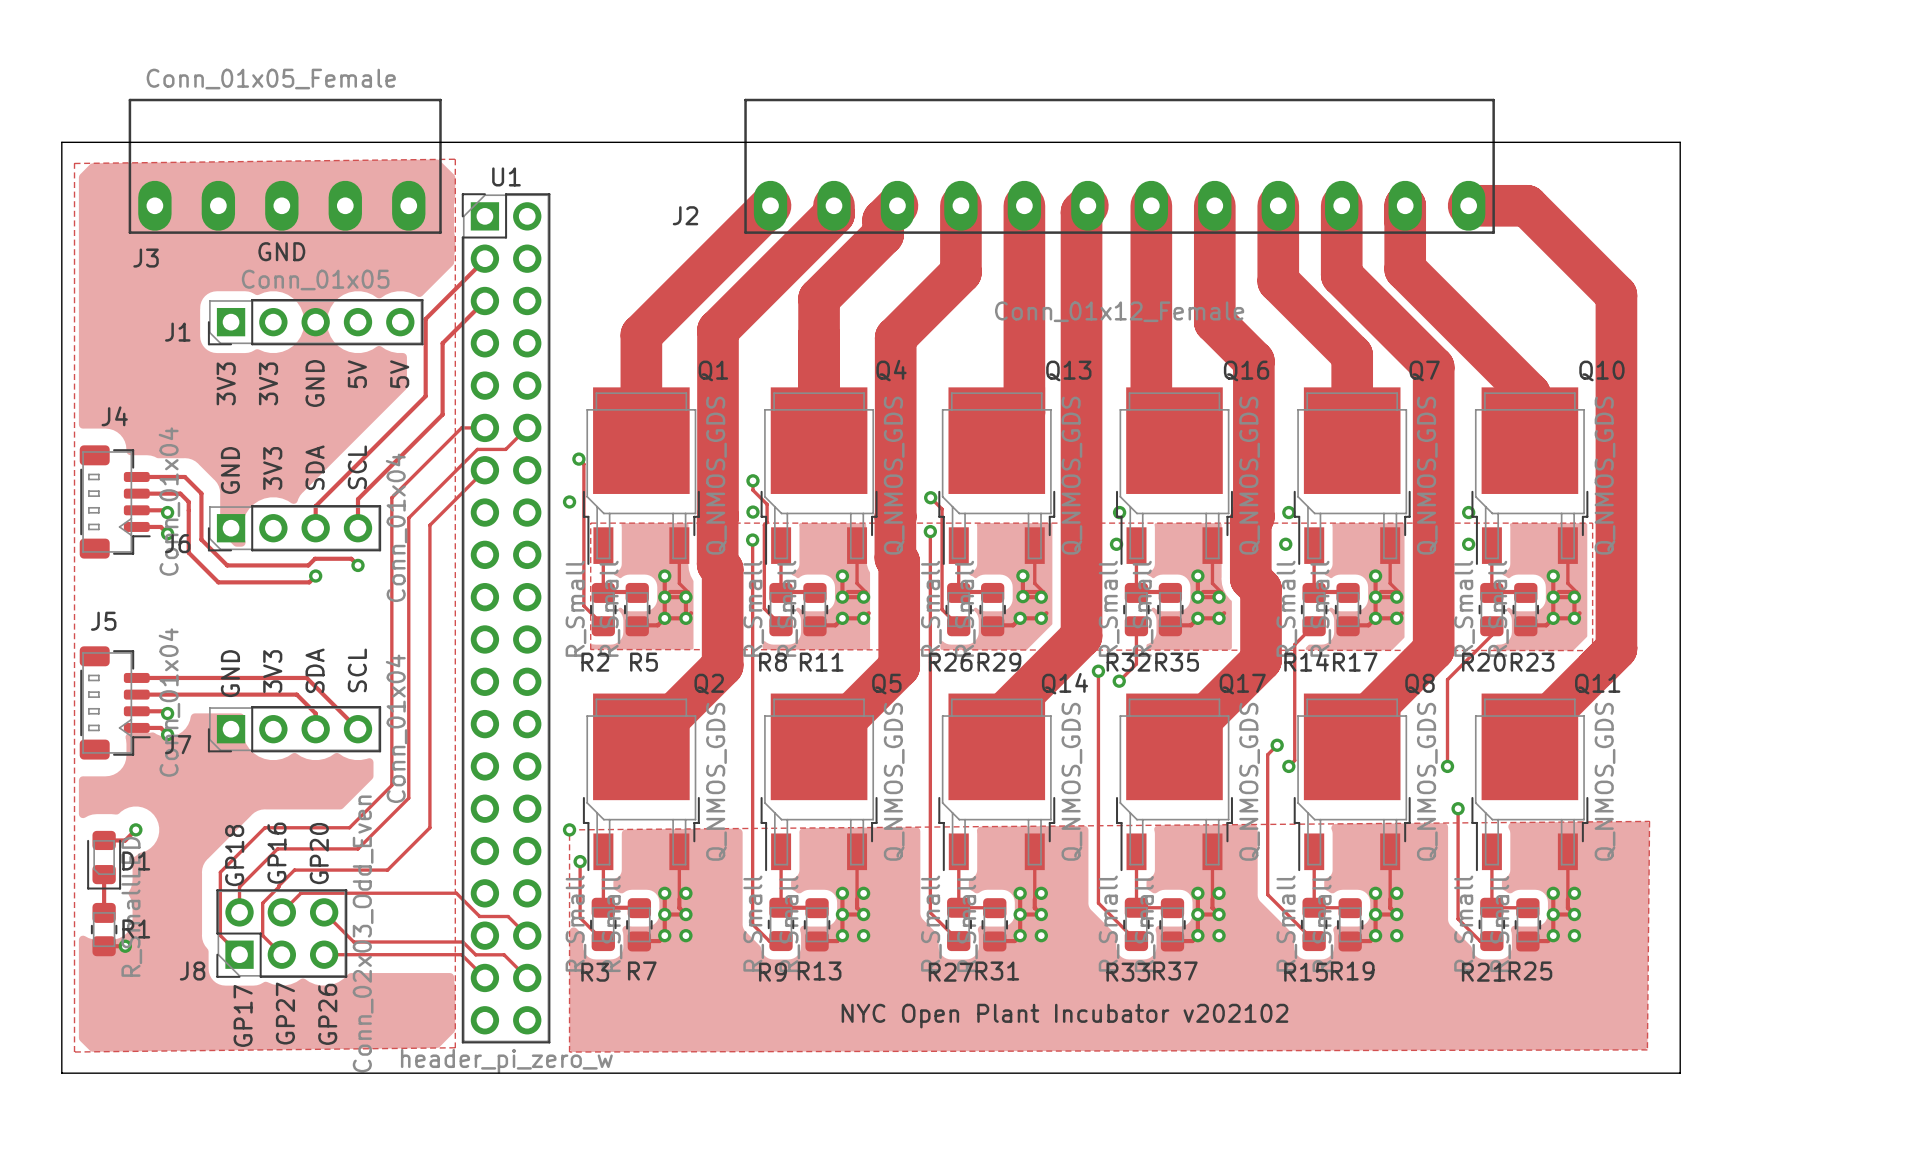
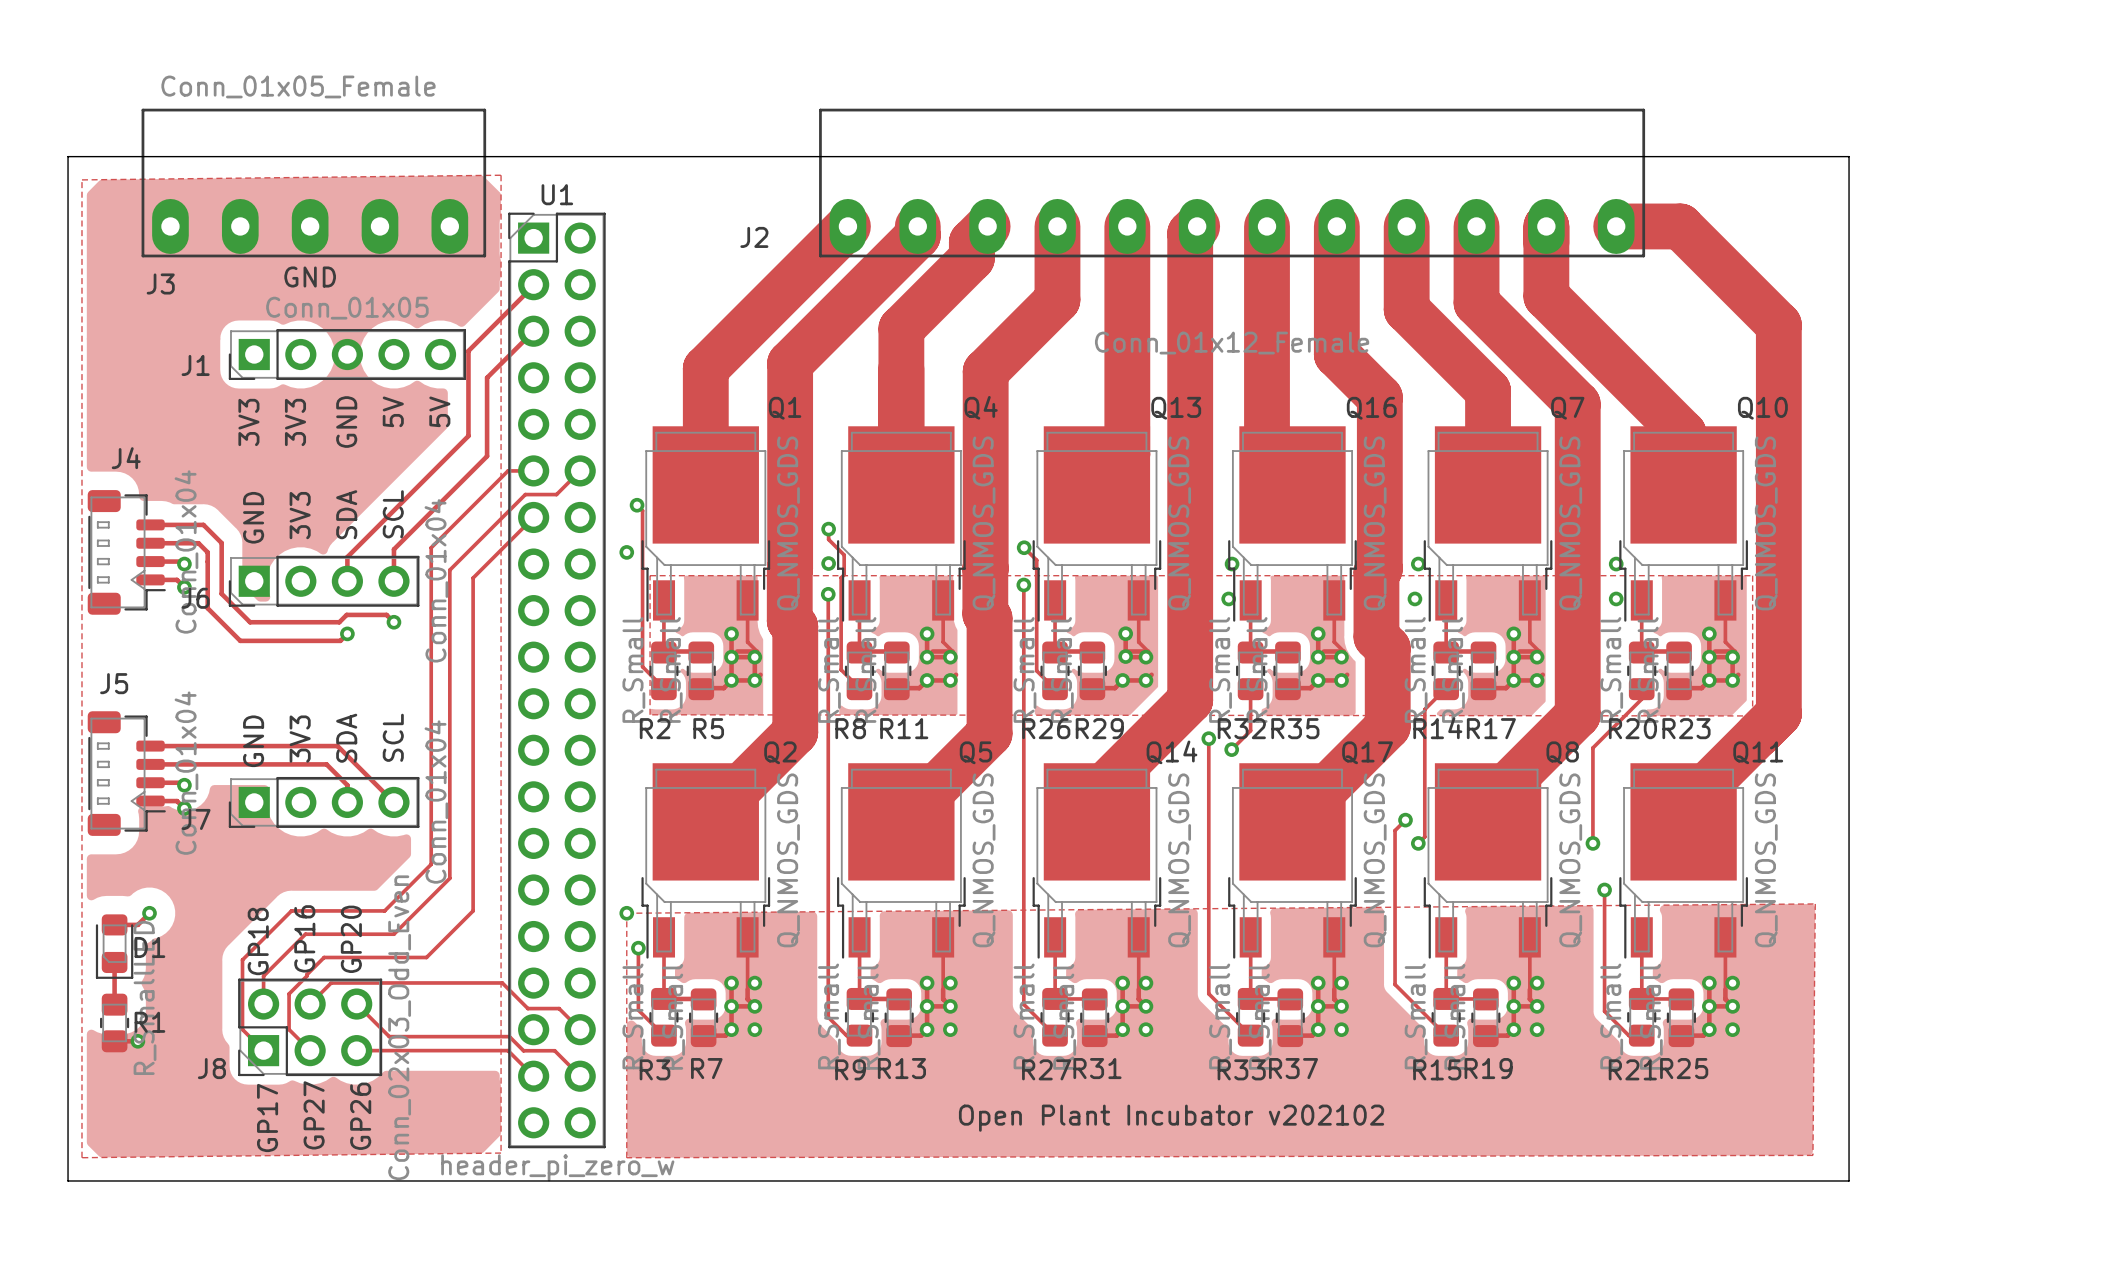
text: NYC Open Plant Incubator v202102 (1064, 1016) -> Open Plant Incubator v202102 (1171, 1118)

